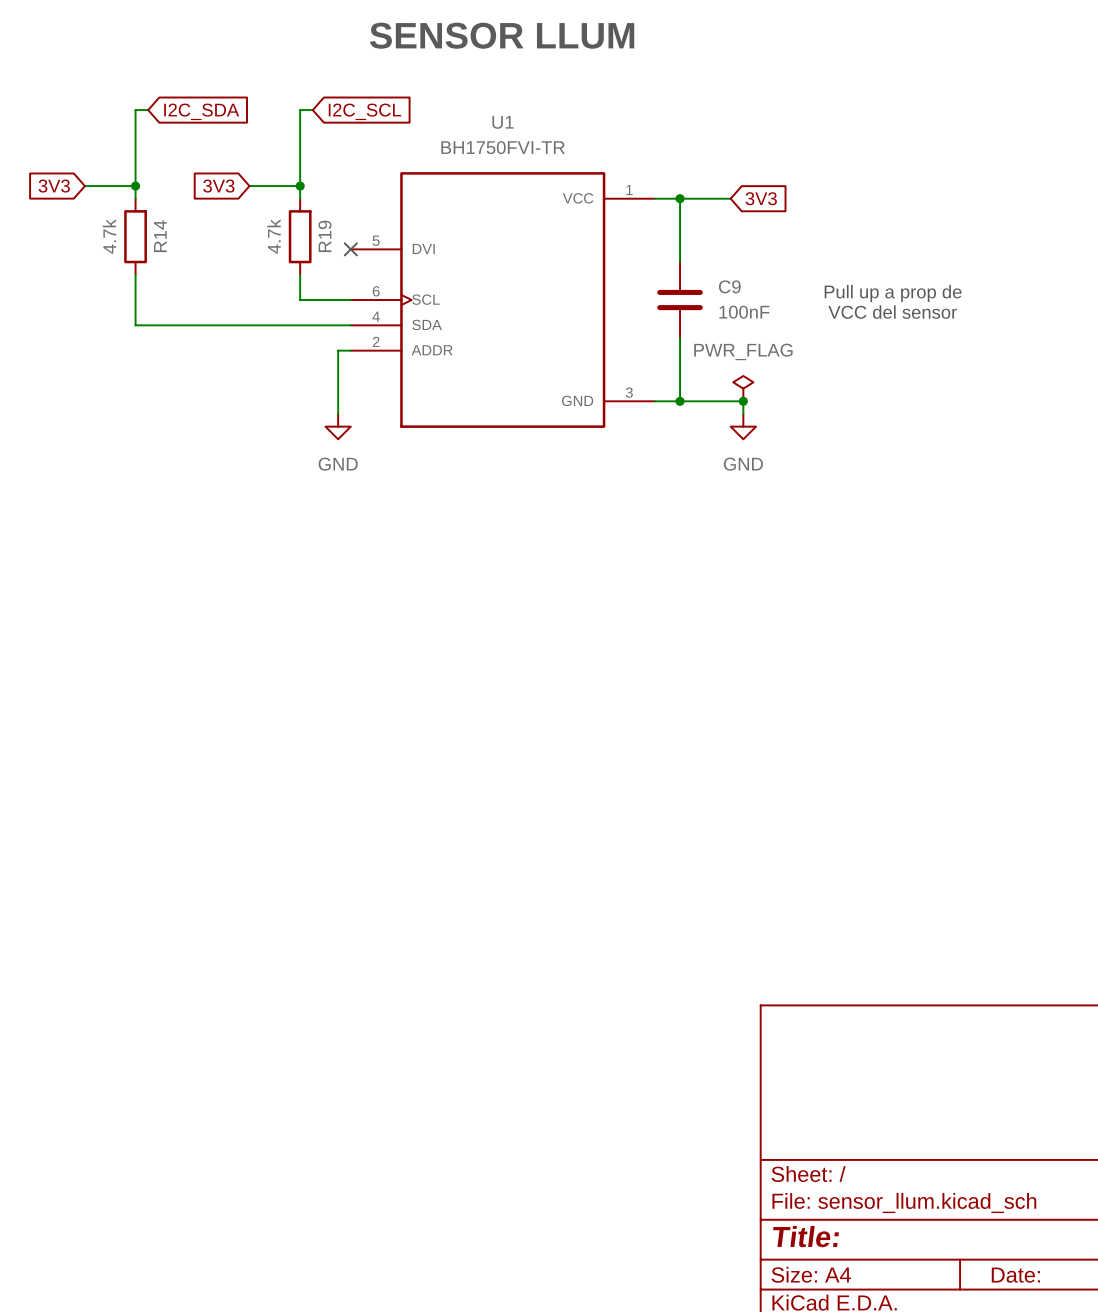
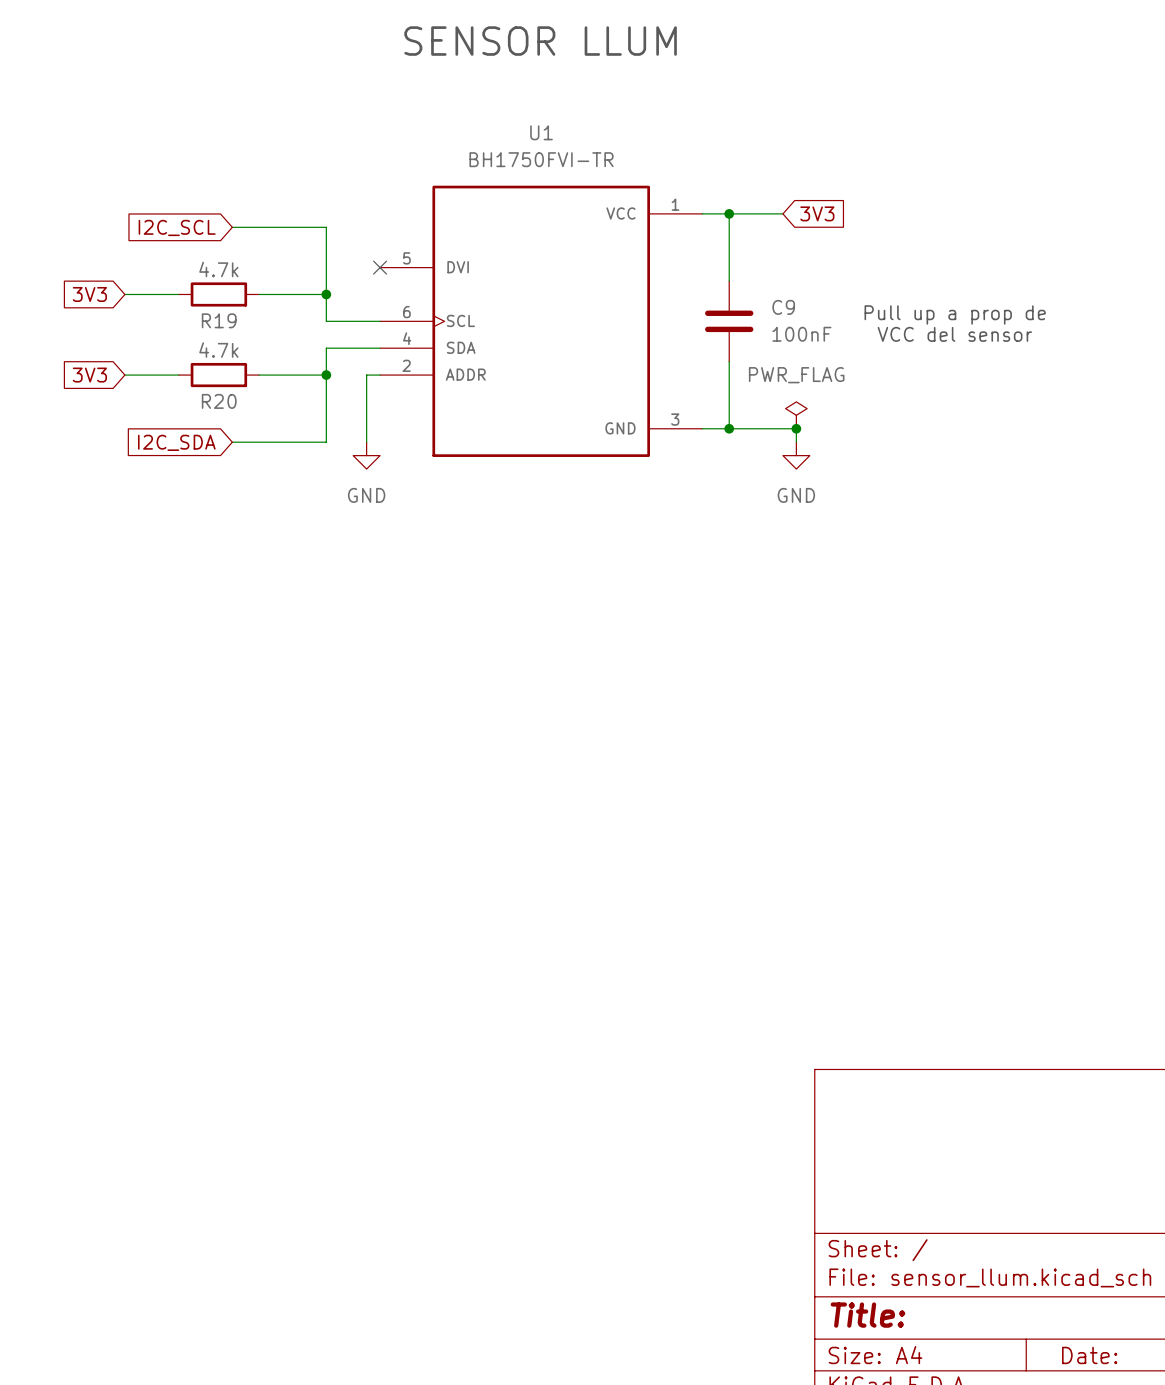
wire: (148, 110) (135, 110) (135, 198) -> none
wire: (312, 110) (300, 110) (300, 198) -> none
global label: I2C_SDA (201, 111) -> none
global label rotation: 0° (364, 111) -> 180° (177, 227)
global label position: I2C_SCL (364, 111) -> I2C_SCL (177, 227)
global label: 3V3 (54, 186) -> none
wire: (84, 186) (135, 186) -> (124, 294) (178, 294)
junction: (135, 186) -> none
global label: 3V3 (218, 186) -> none
wire: (249, 186) (300, 186) -> (124, 375) (178, 375)
junction: (300, 186) -> none
wire: none -> (232, 227) (326, 227) (326, 294) (259, 294)
R14: 4.7k (135, 236) -> none
R19 rotation: 0° (300, 236) -> 90° clockwise (218, 294)
R19 position: (300, 236) -> (218, 294)
global label: none -> 3V3 (89, 294)
wire: (135, 274) (135, 325) (300, 325) -> (232, 442) (326, 442) (326, 348)
junction: none -> (326, 294)
global label: none -> 3V3 (89, 375)
R20: none -> 4.7k (218, 375)
wire: none -> (259, 375) (326, 375)
junction: none -> (326, 375)
global label: none -> I2C_SDA (176, 442)

